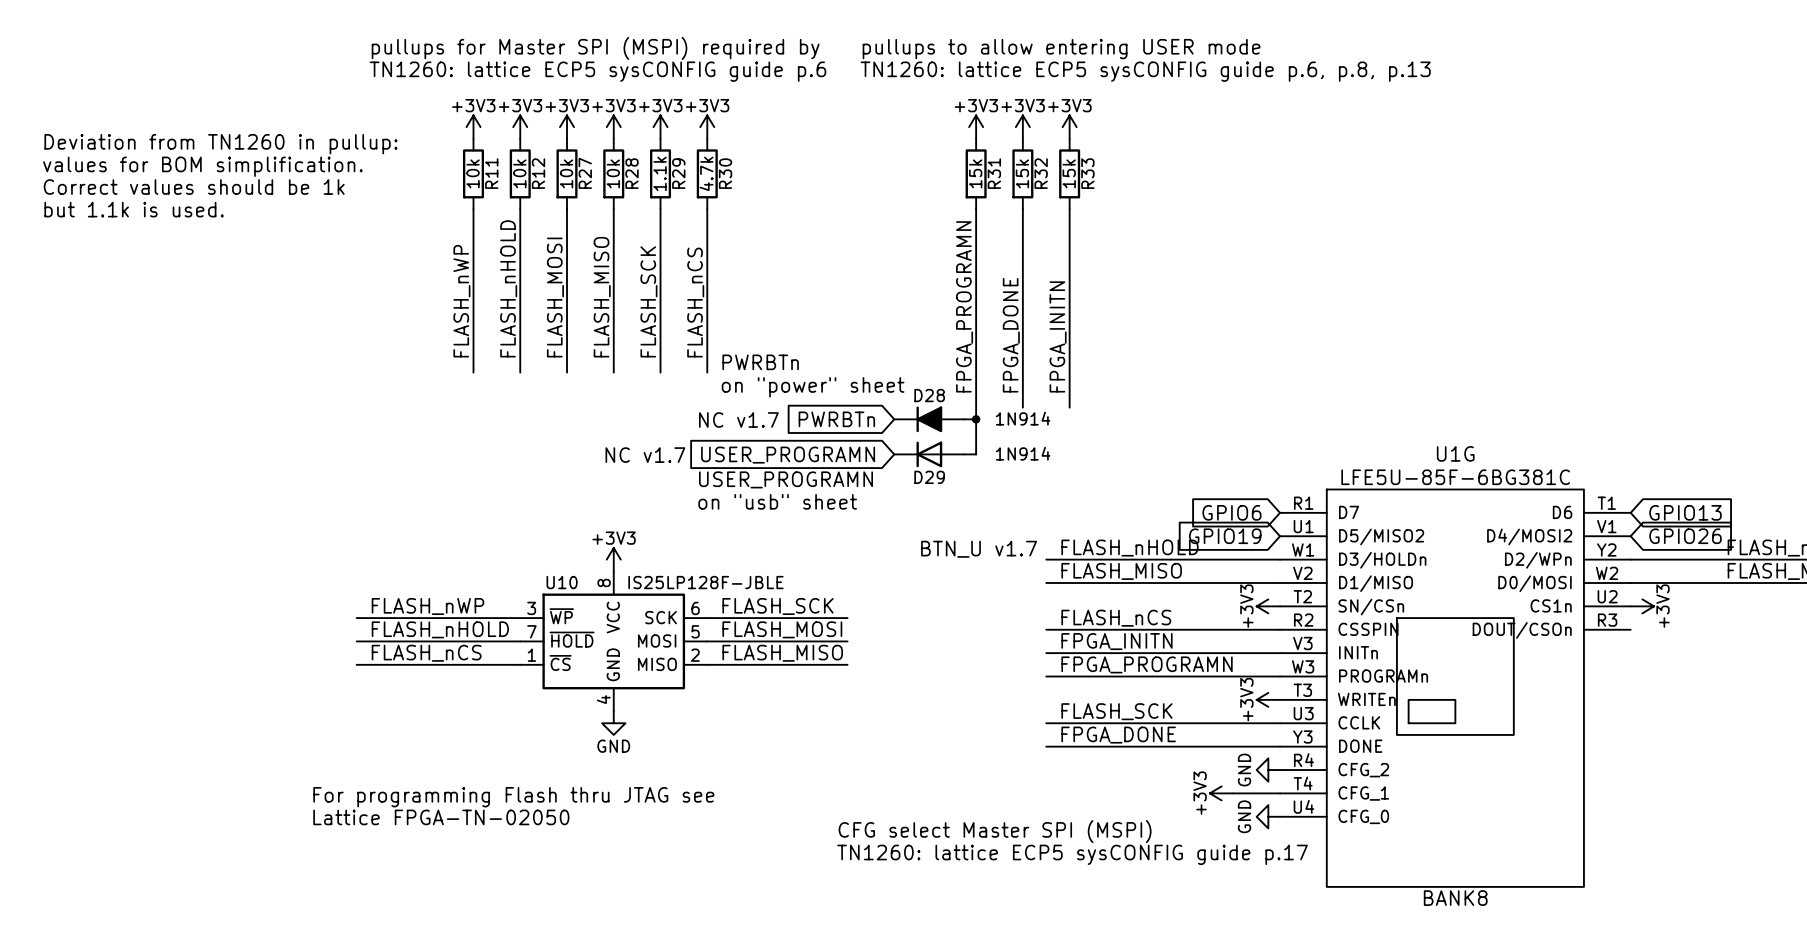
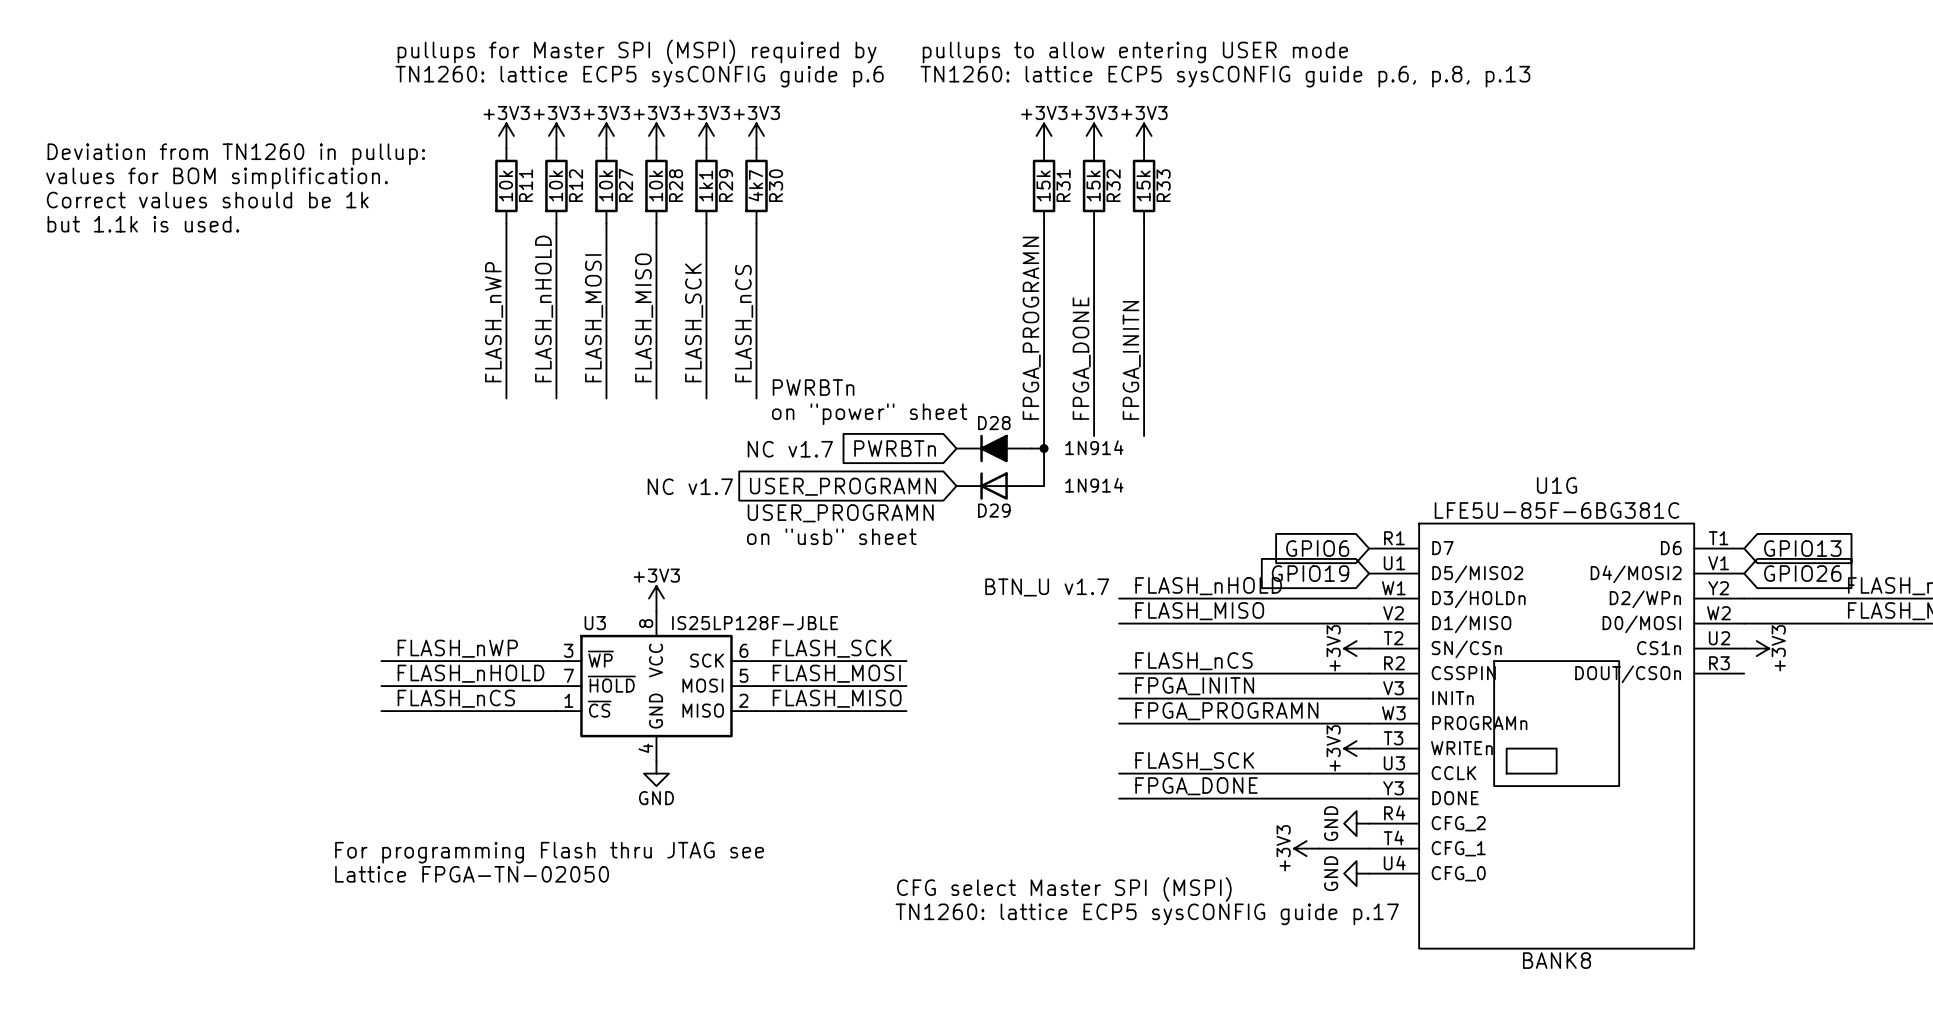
R29 value: 1.1k (660, 173) -> 1k1 (706, 185)
R30 value: 4.7k (706, 173) -> 4k7 (755, 185)
U10 name: U10 (562, 582) -> U3 (595, 623)

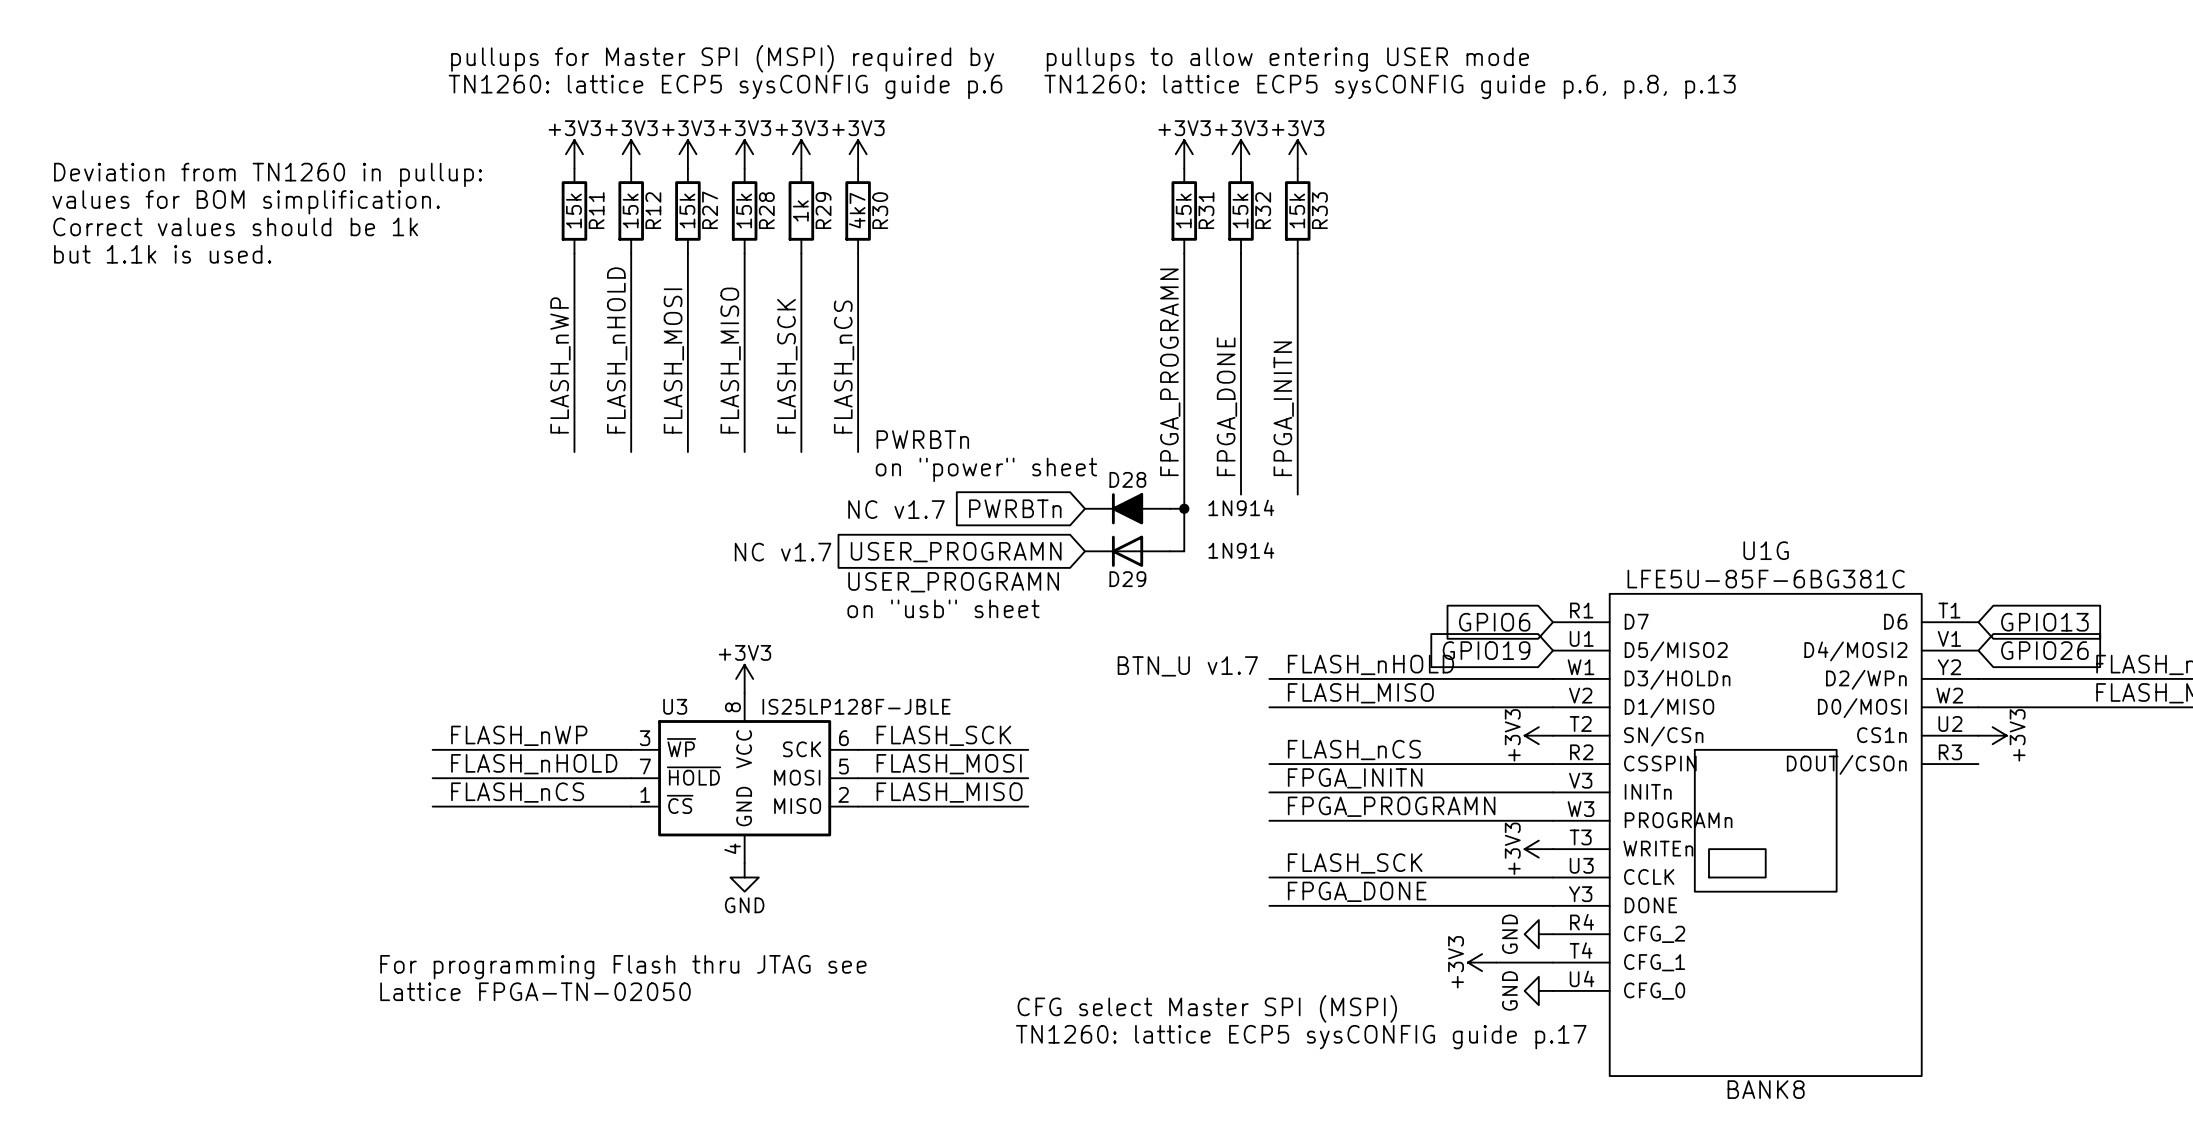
R11 value: 10k (505, 185) -> 15k (573, 210)
R12 value: 10k (555, 185) -> 15k (630, 210)
R27 value: 10k (605, 185) -> 15k (687, 210)
R28 value: 10k (656, 185) -> 15k (744, 210)
R29 value: 1k1 (706, 185) -> 1k (800, 210)

